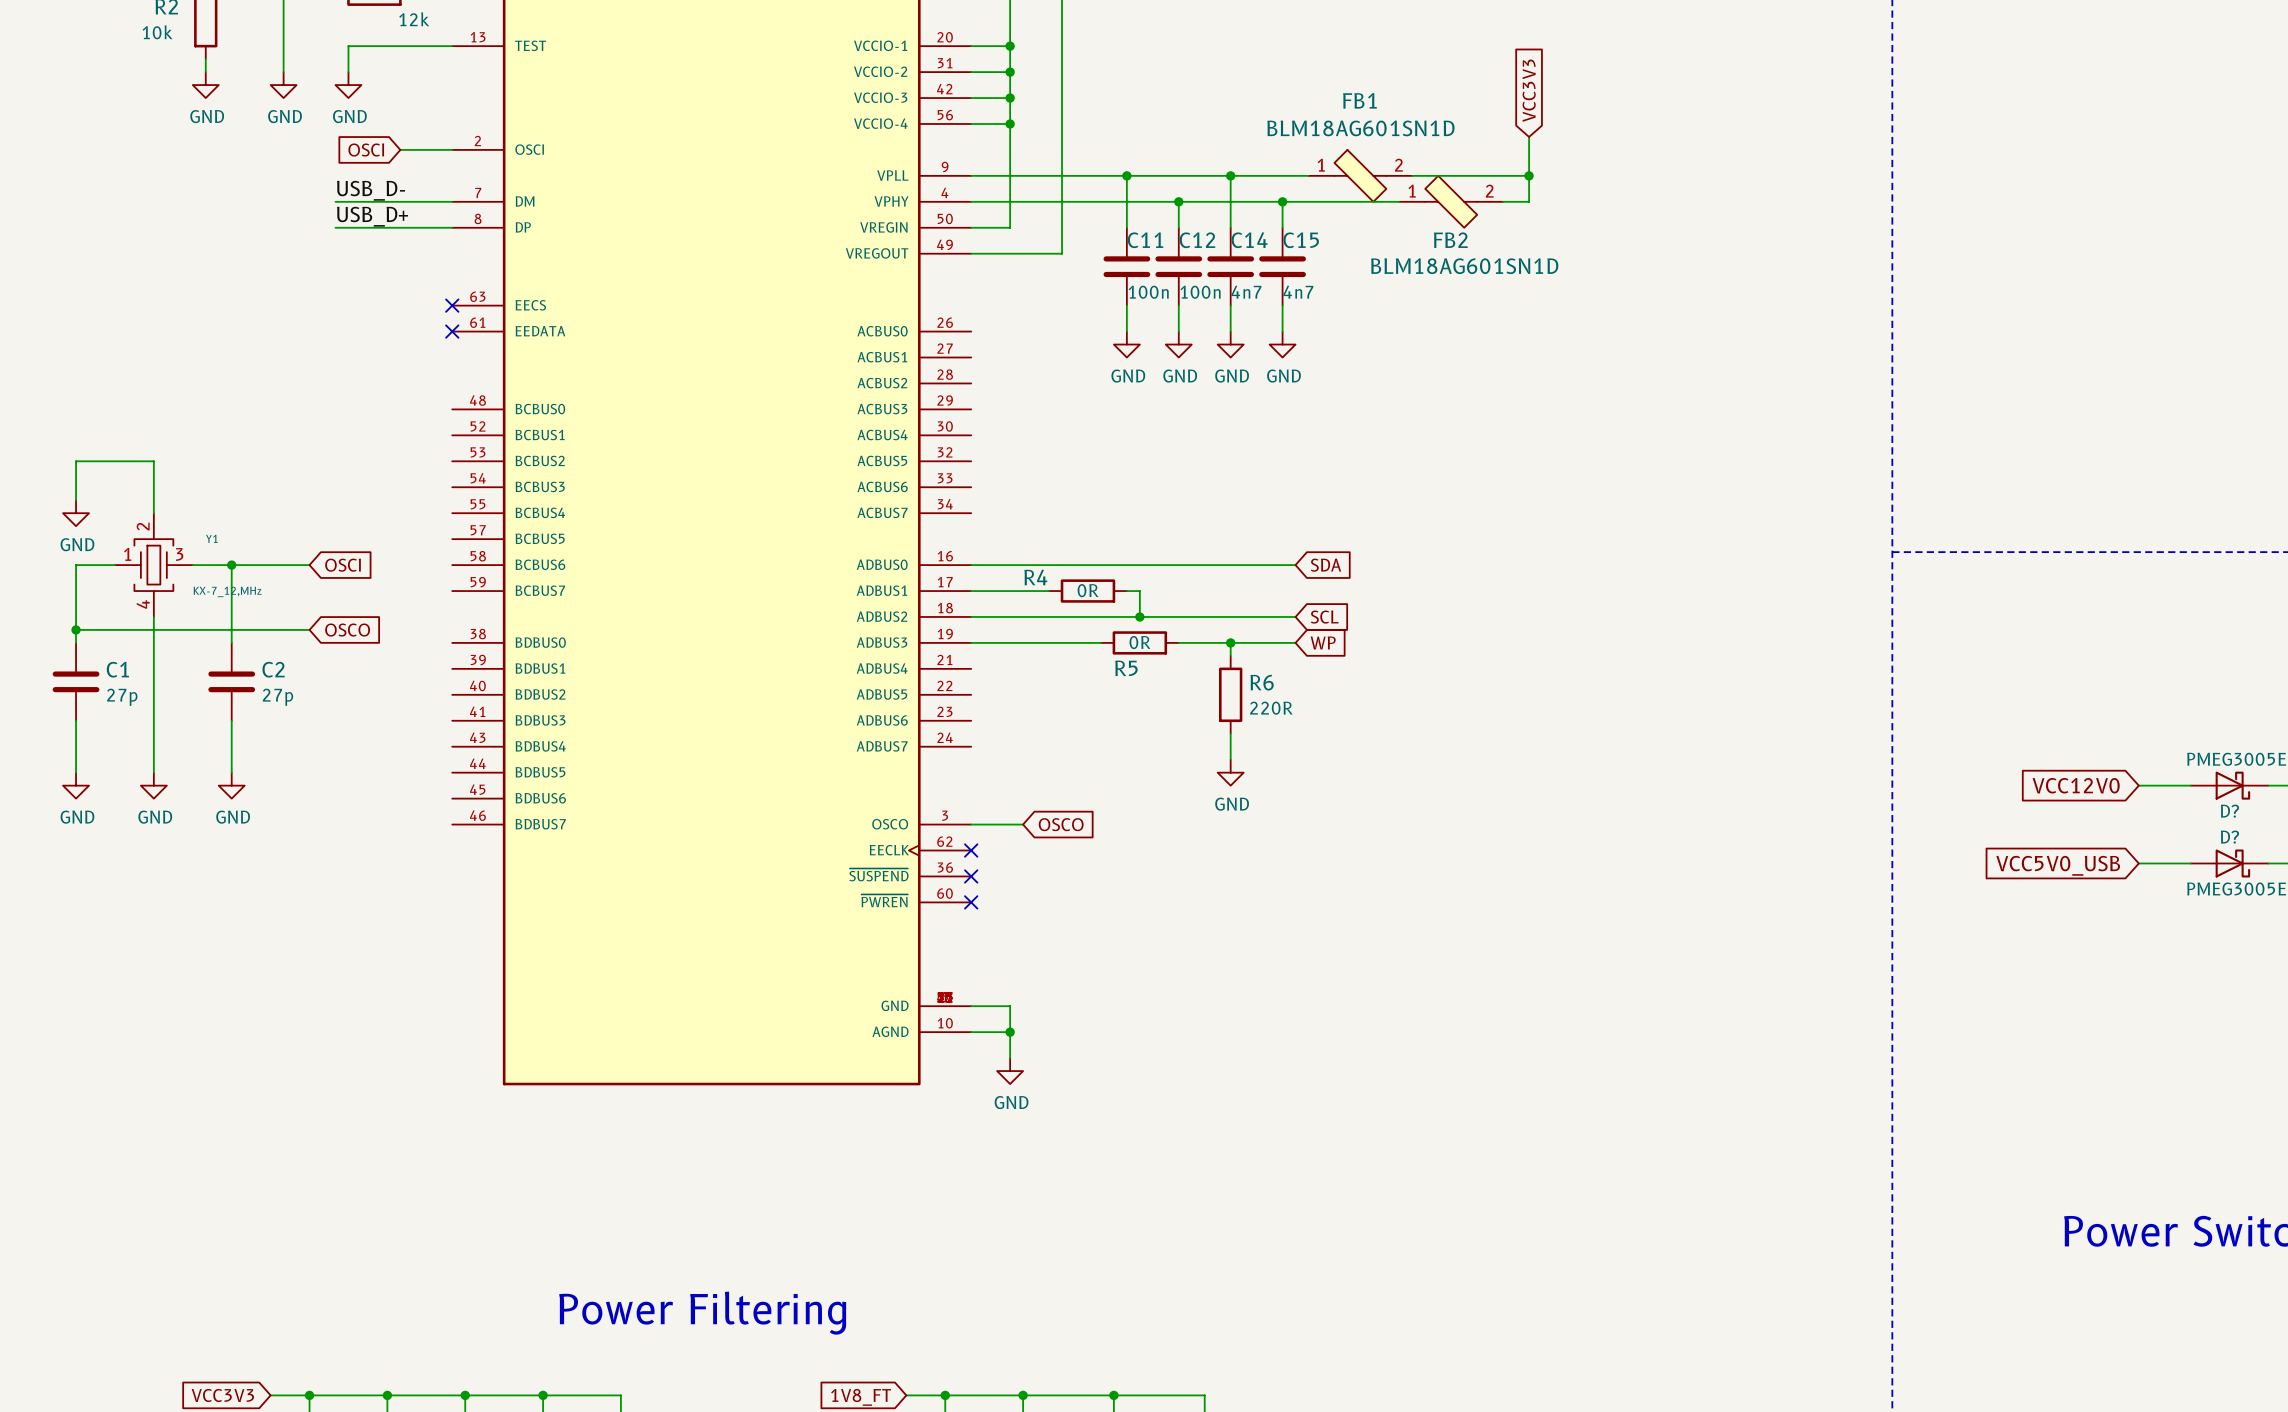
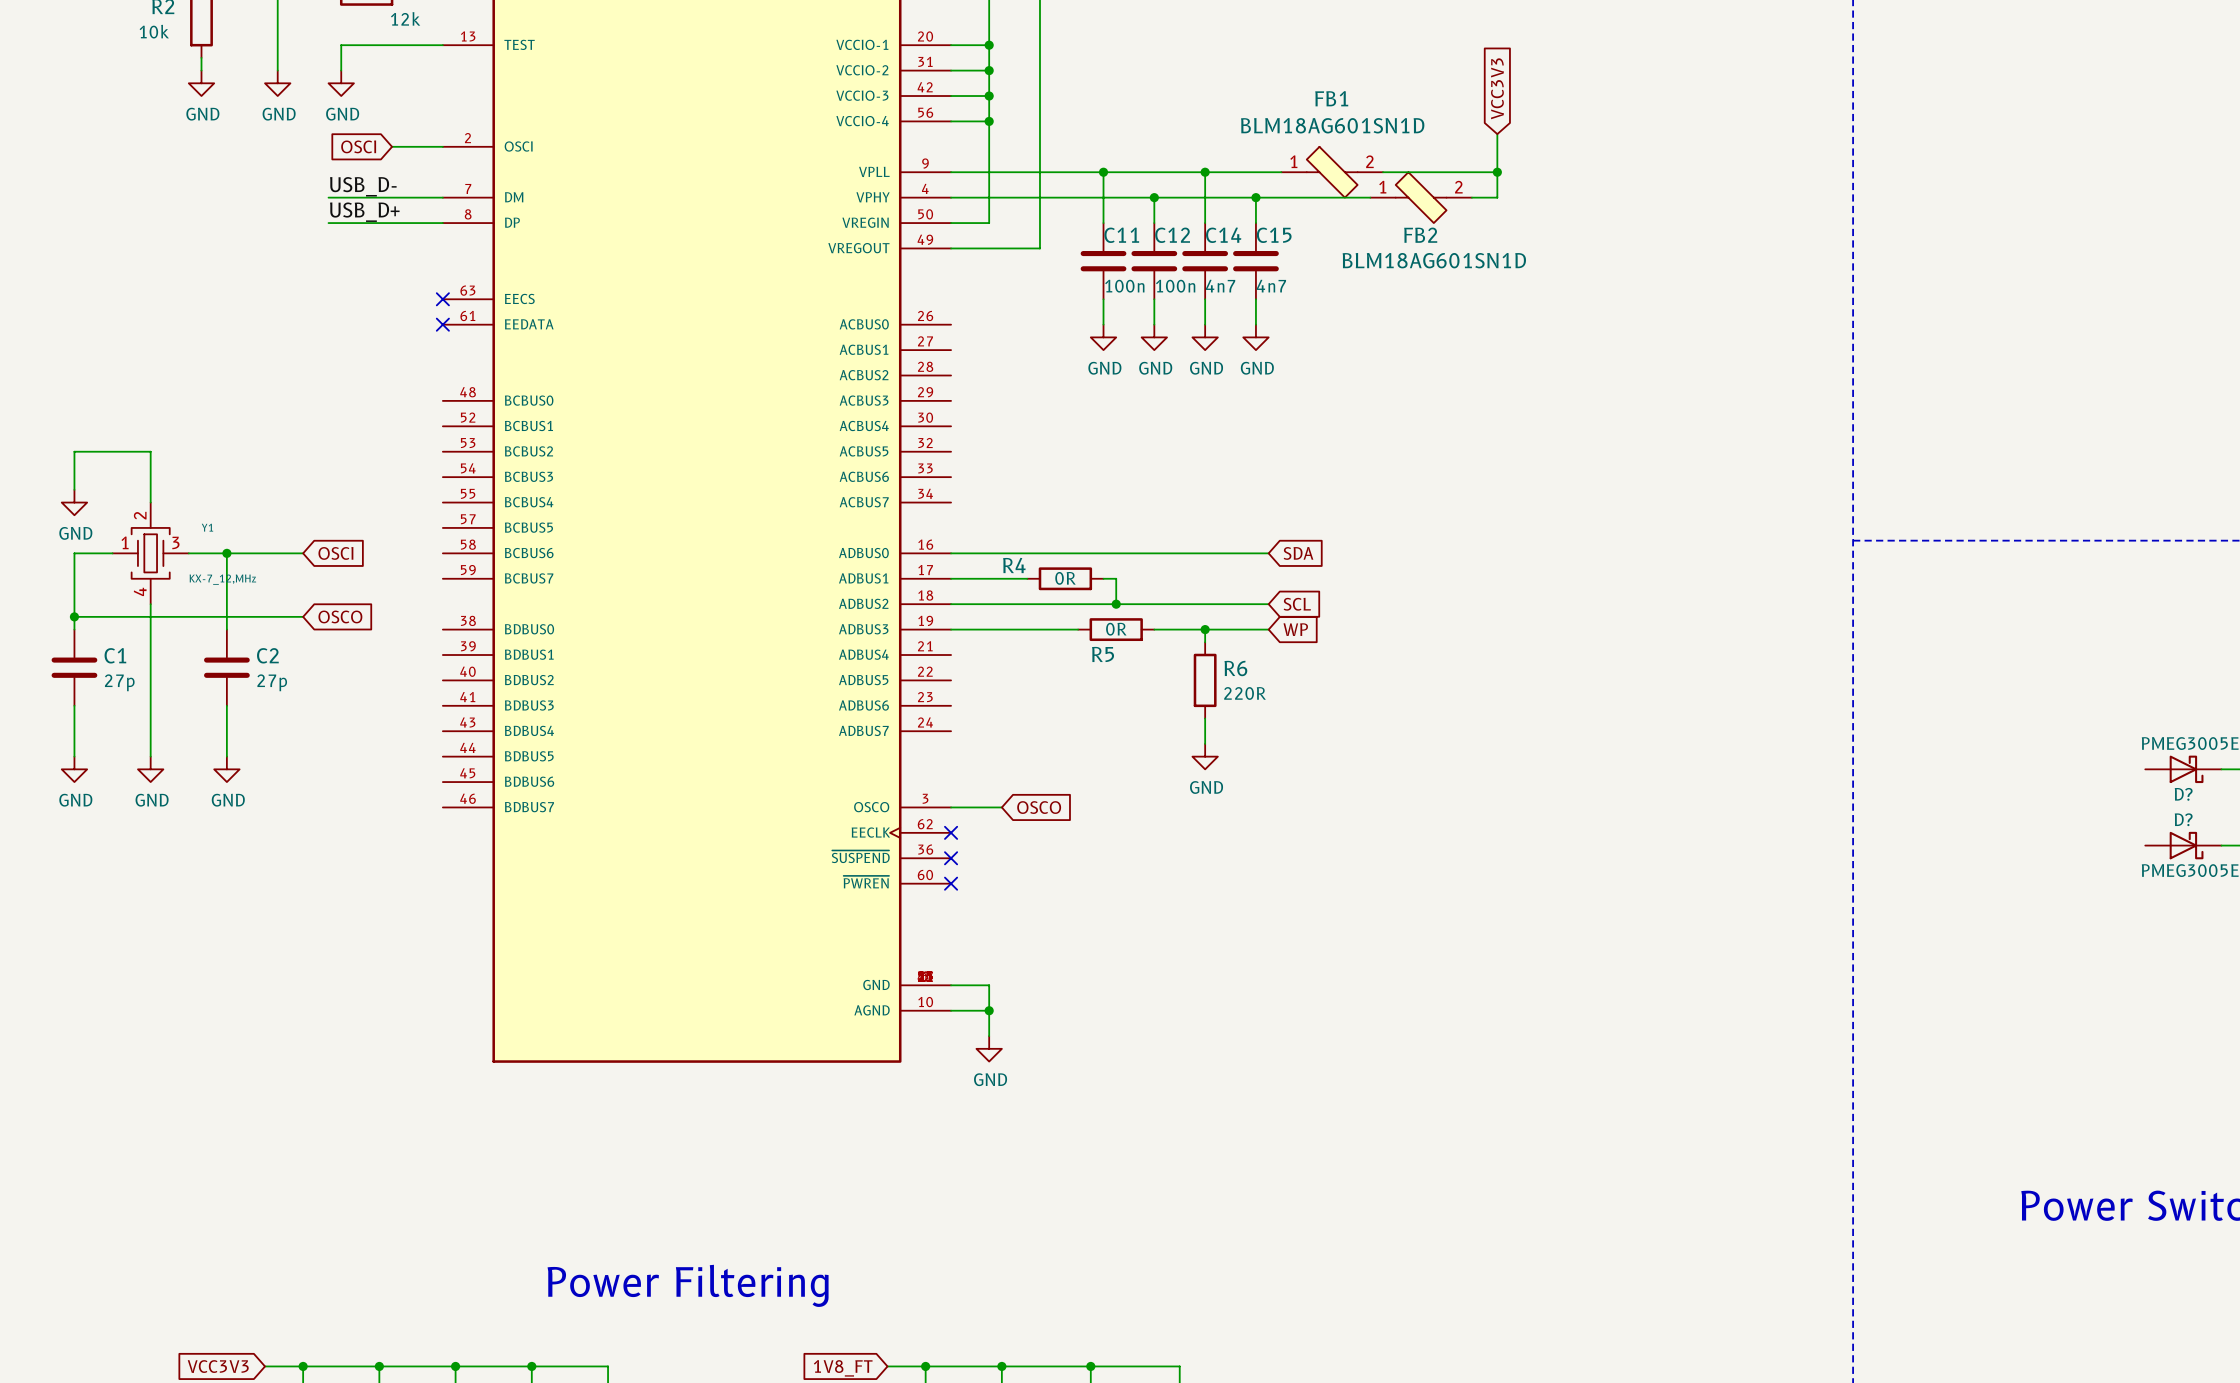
global label: VCC12V0 (2076, 785) -> none
wire: (2138, 785) (2190, 785) -> none
wire: (2138, 863) (2190, 863) -> none
global label: VCC5V0_USB (2058, 865) -> none

